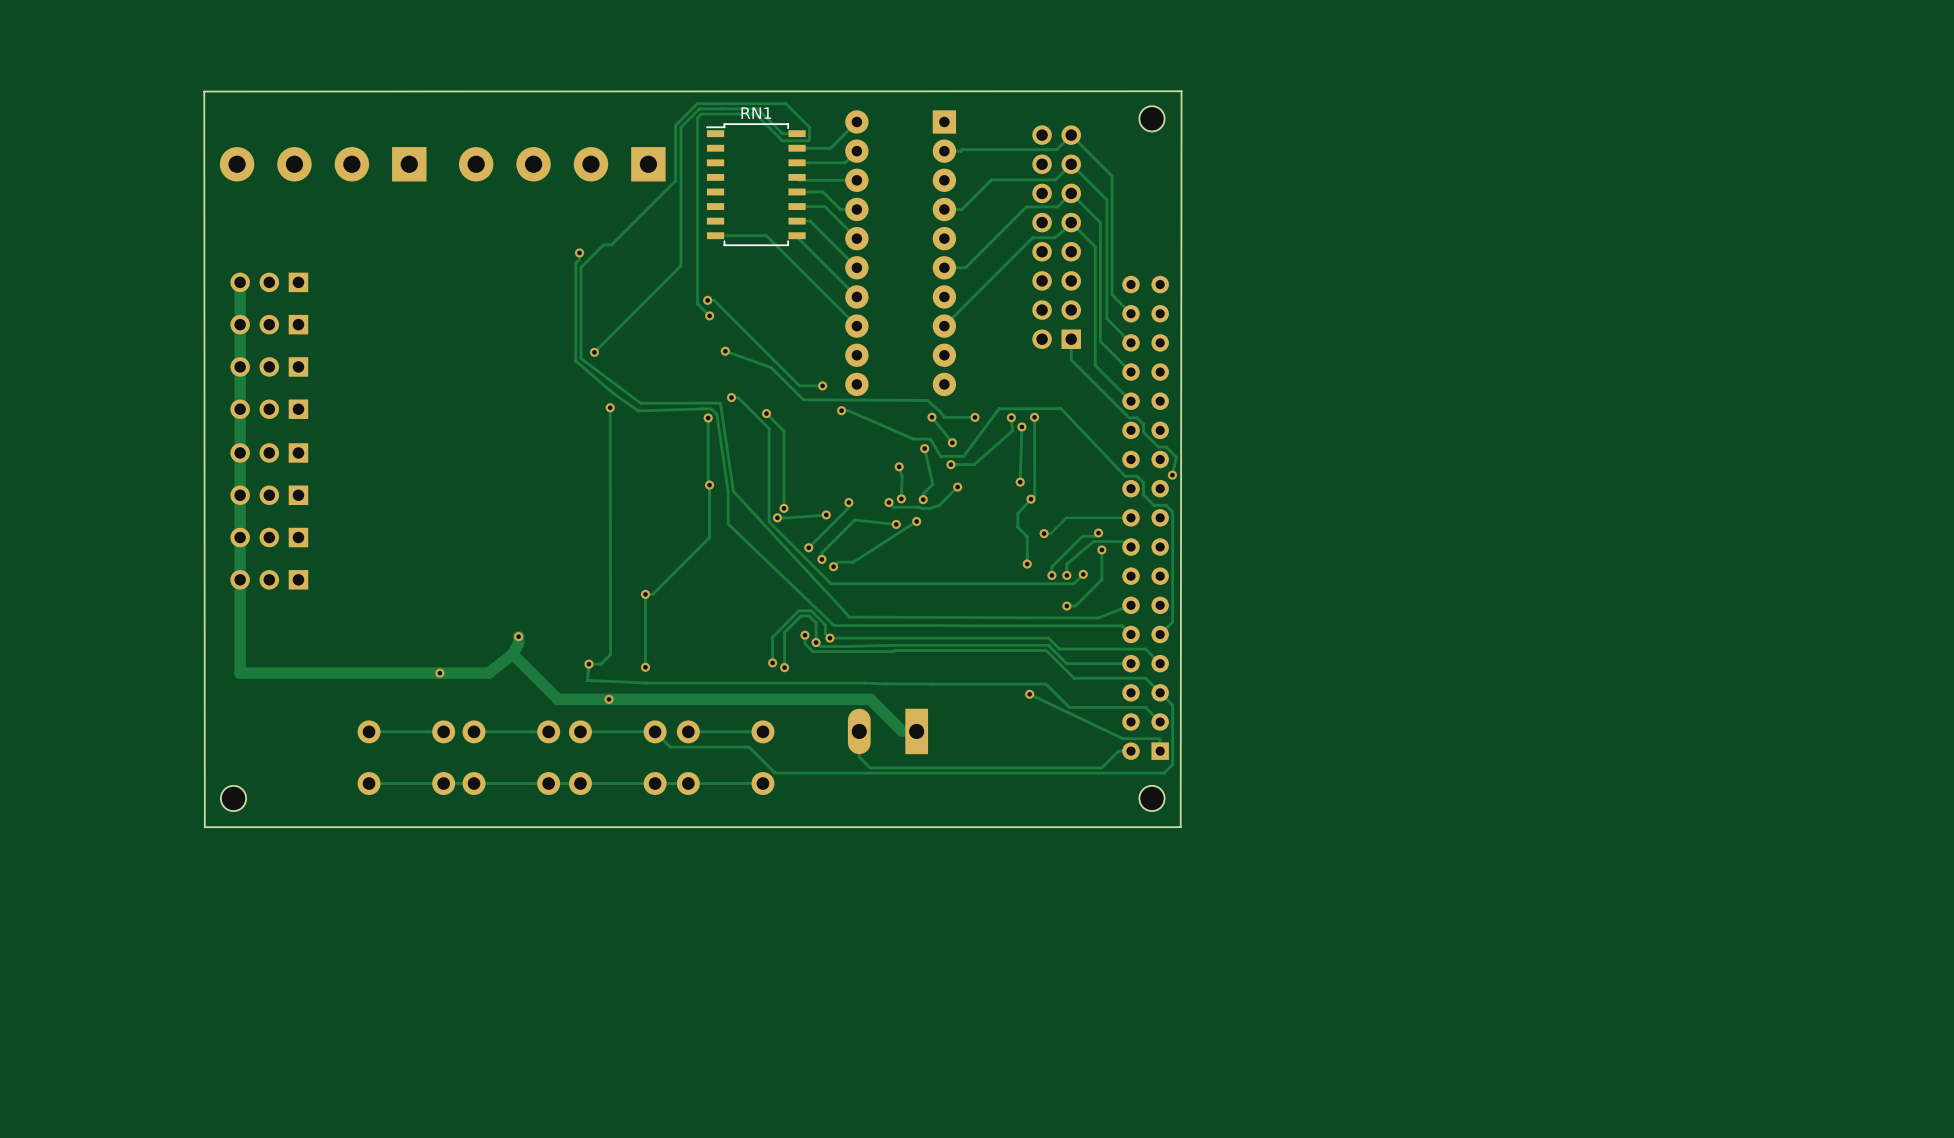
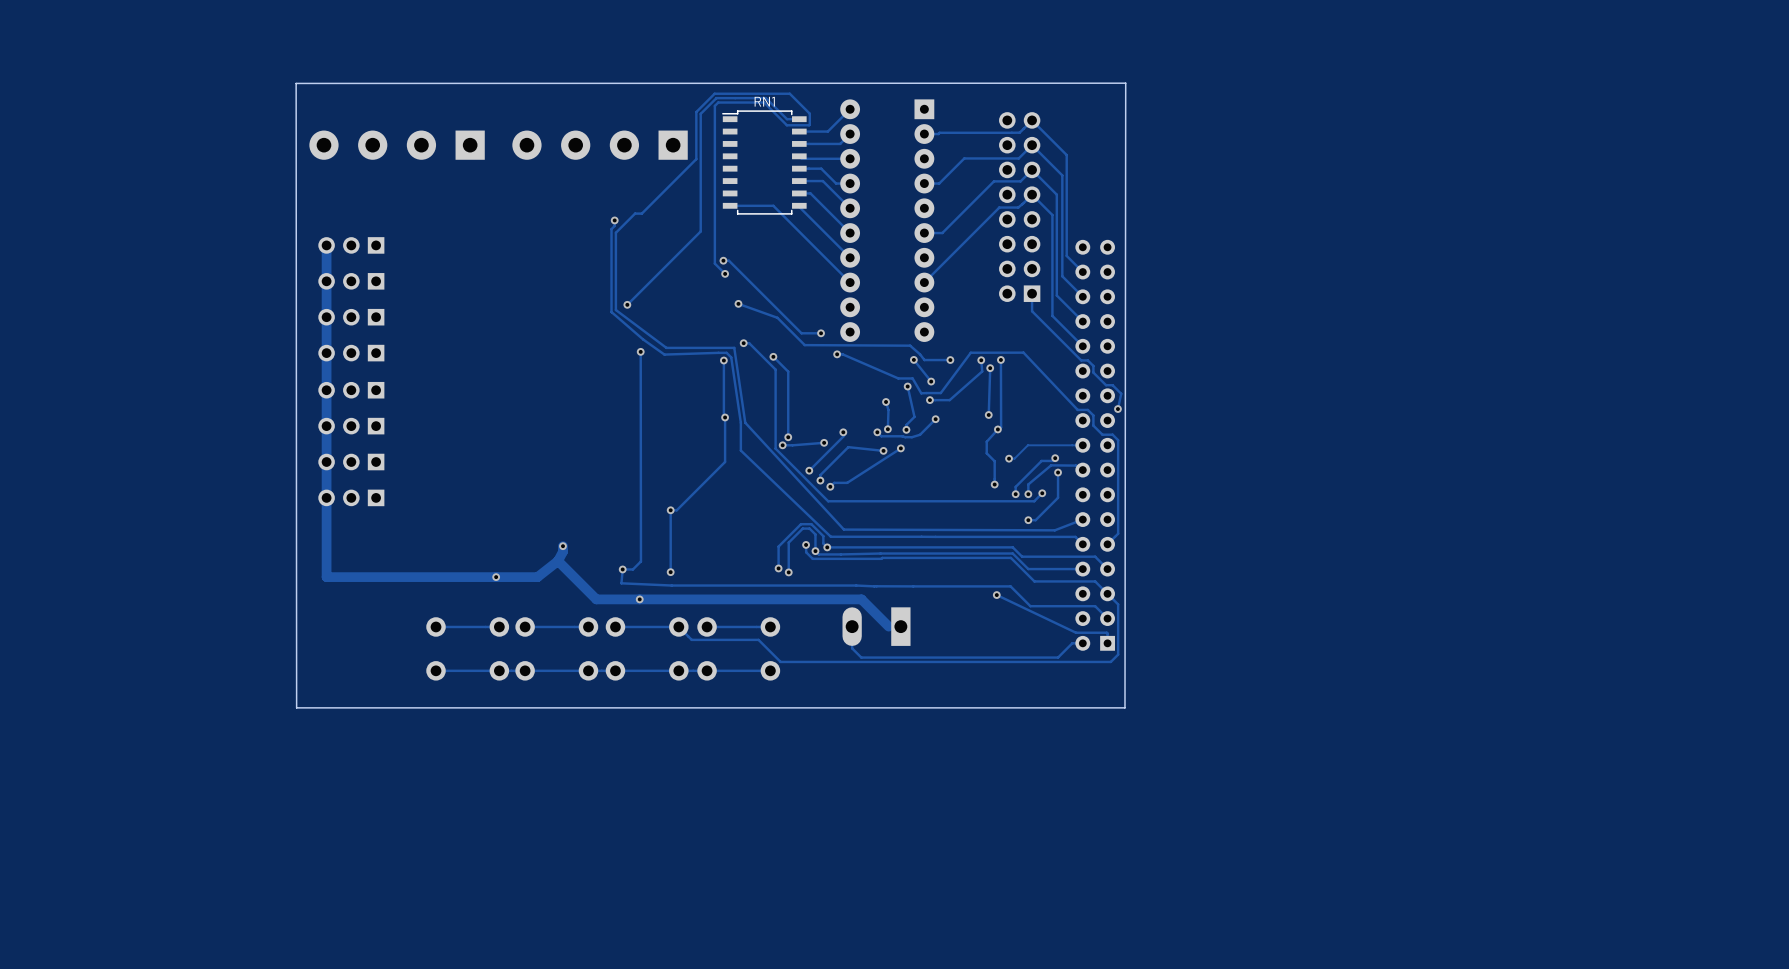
part: (1151, 118) -> none
part: (233, 798) -> none
part: (1151, 798) -> none

